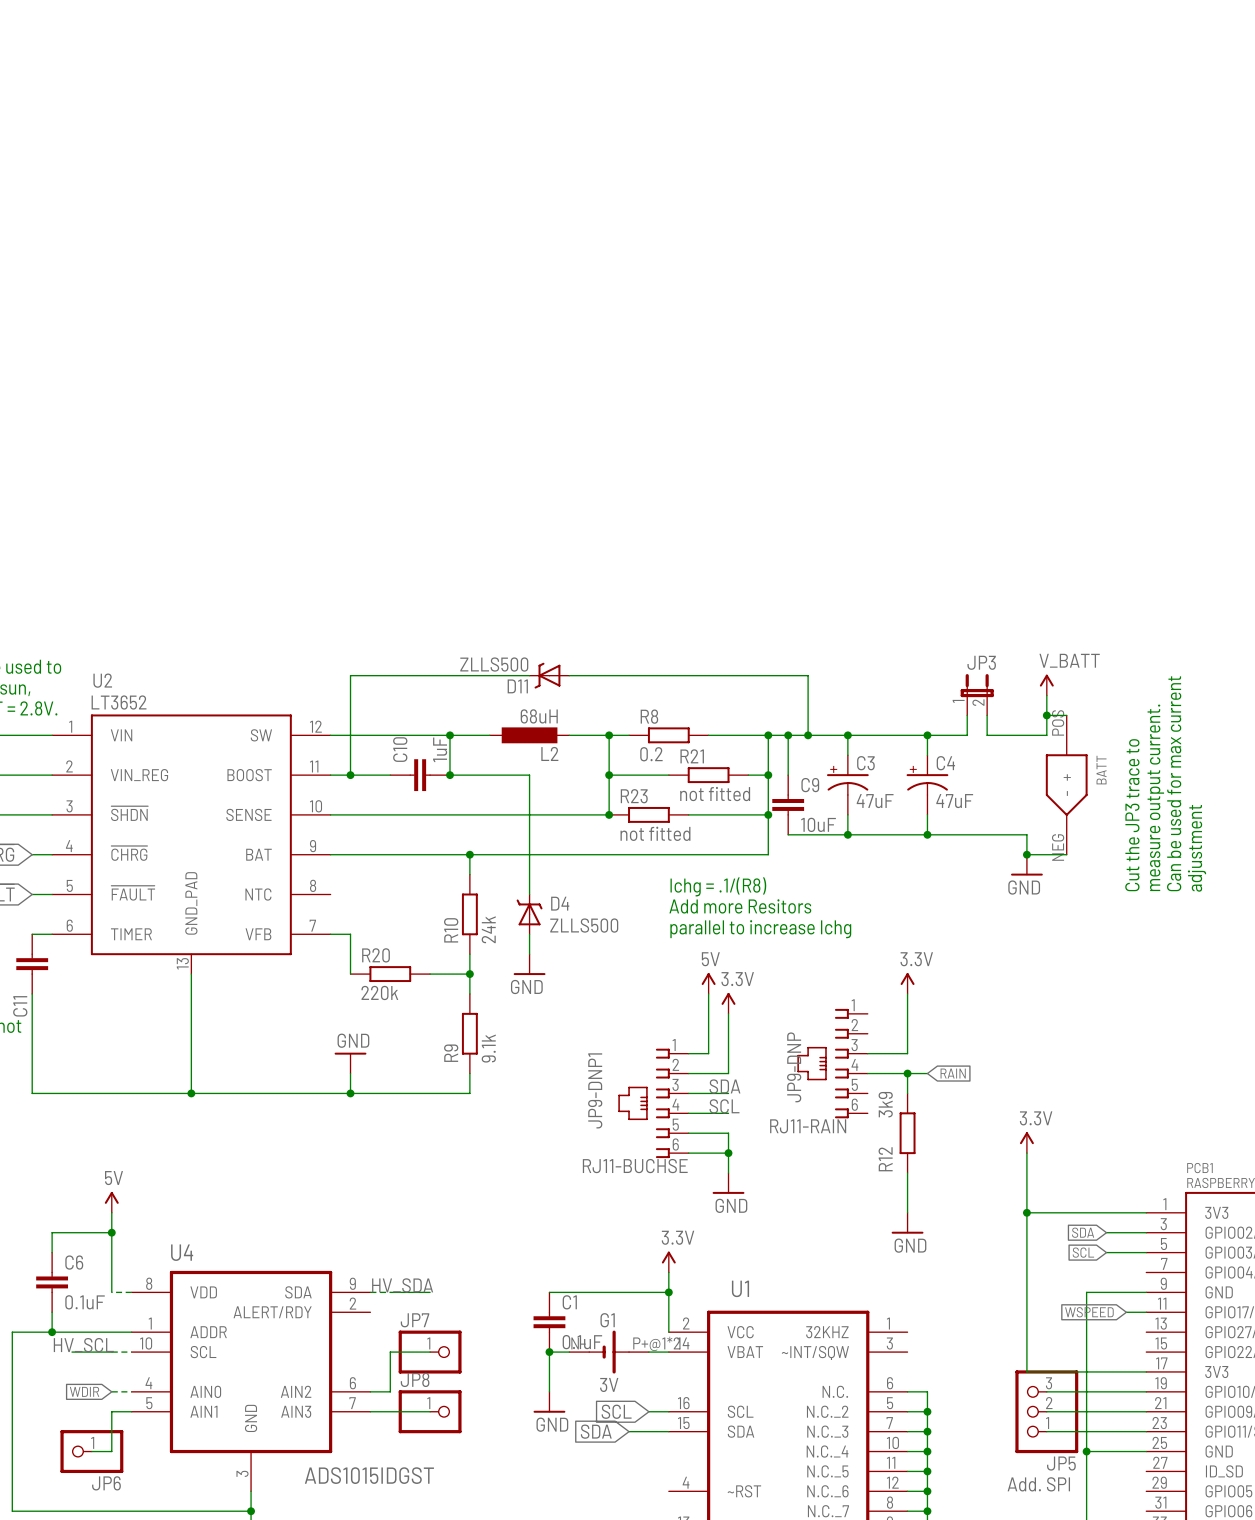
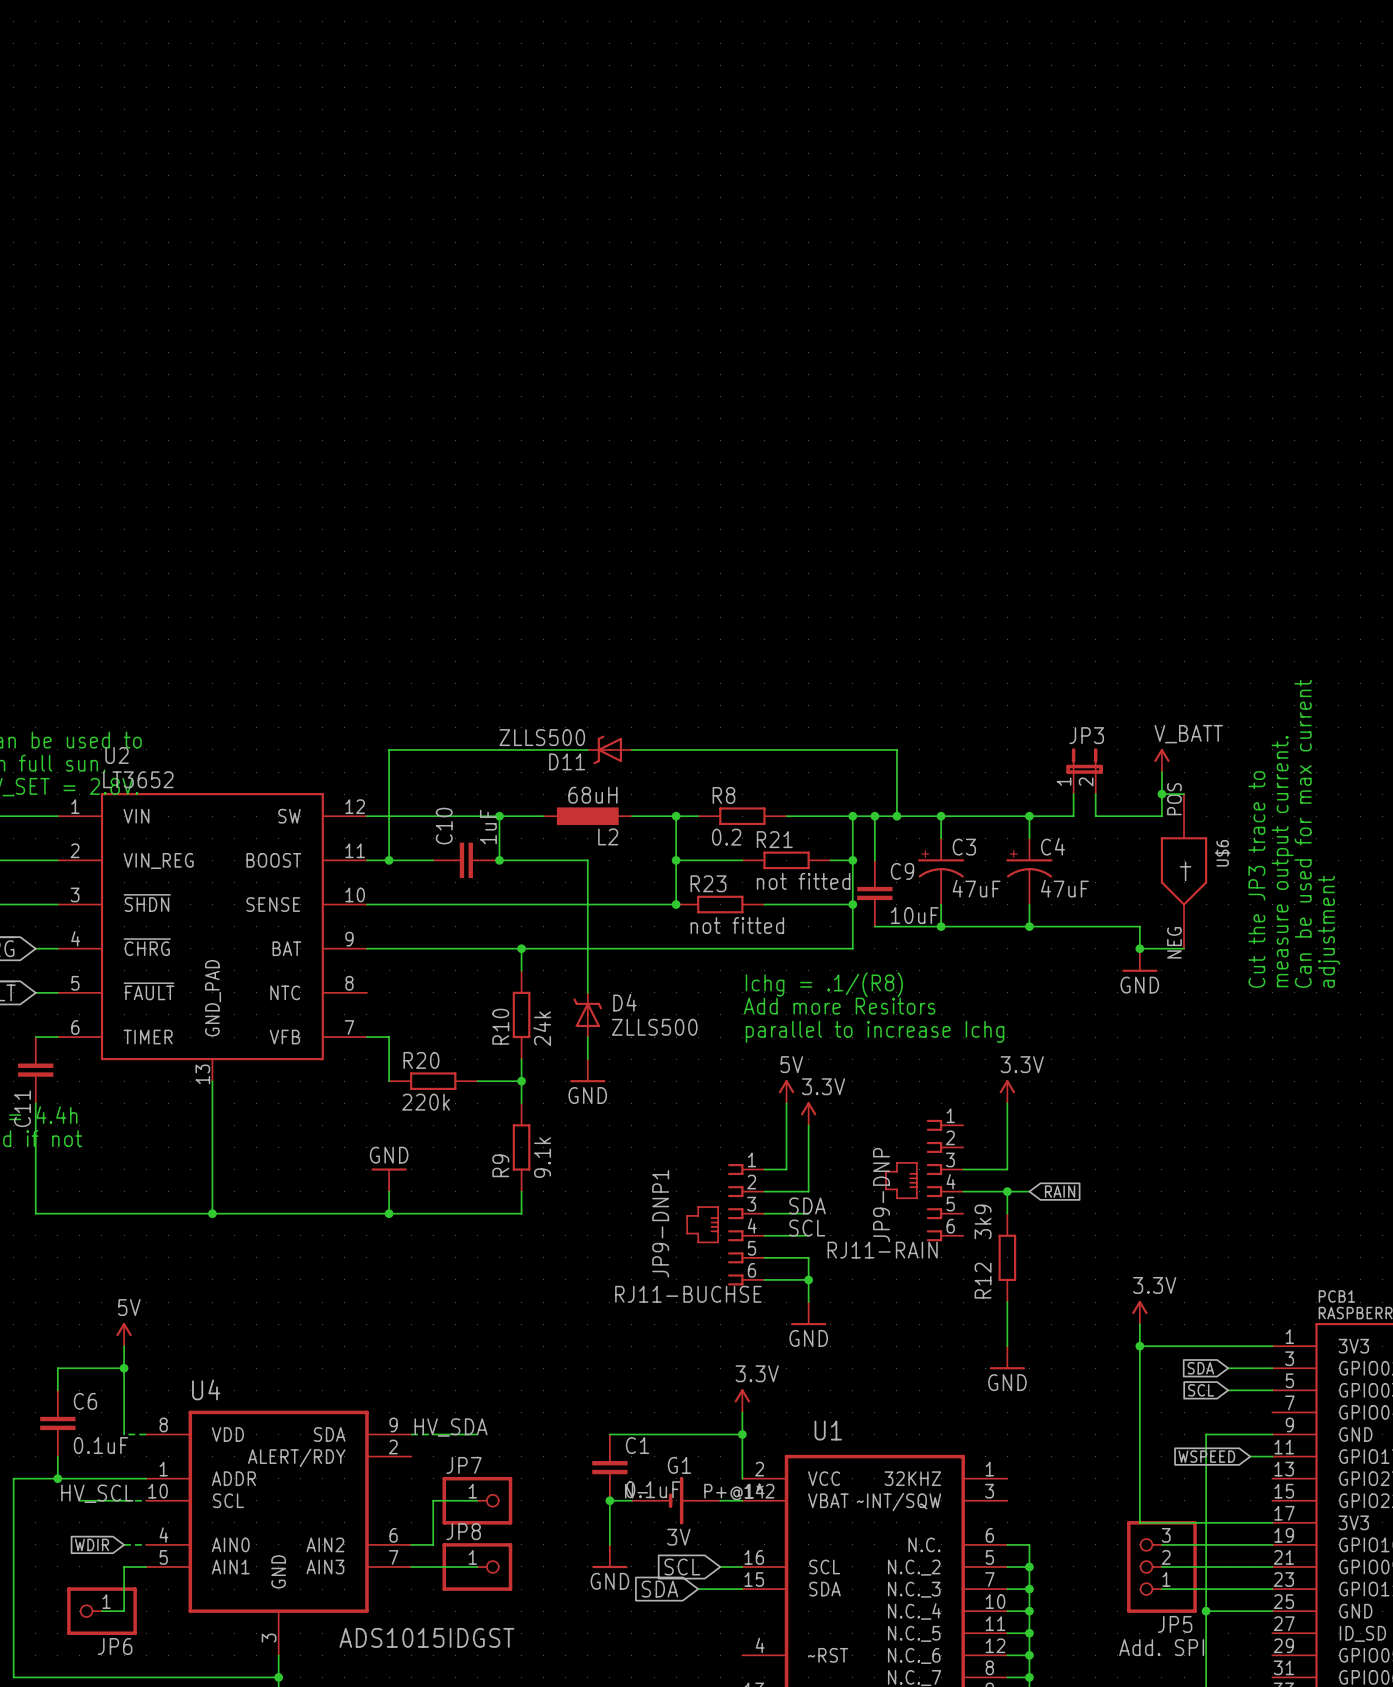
BATT name: BATT (1101, 770) -> U$6 (1222, 853)
power symbol position: 3.3V (1026, 1142) -> 3.3V (1139, 1312)

